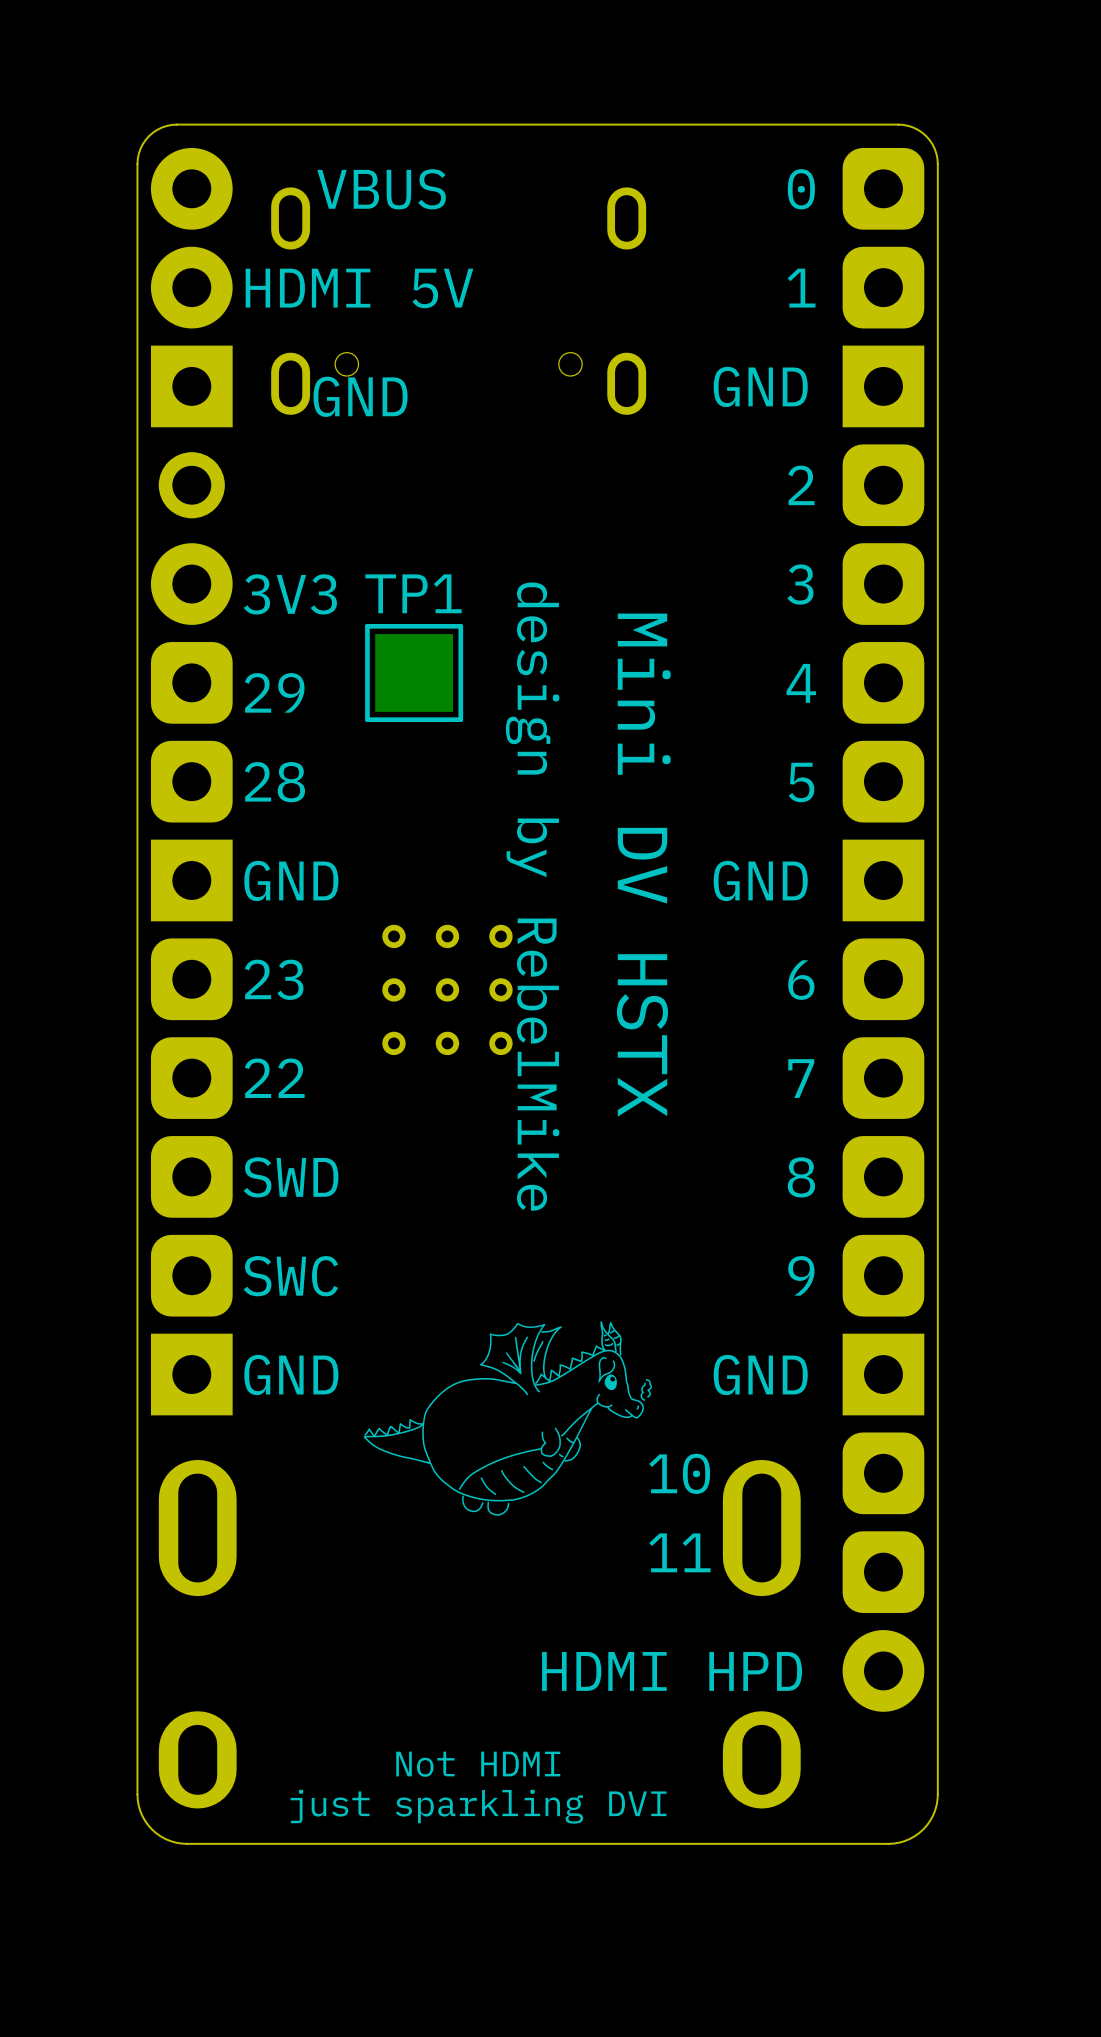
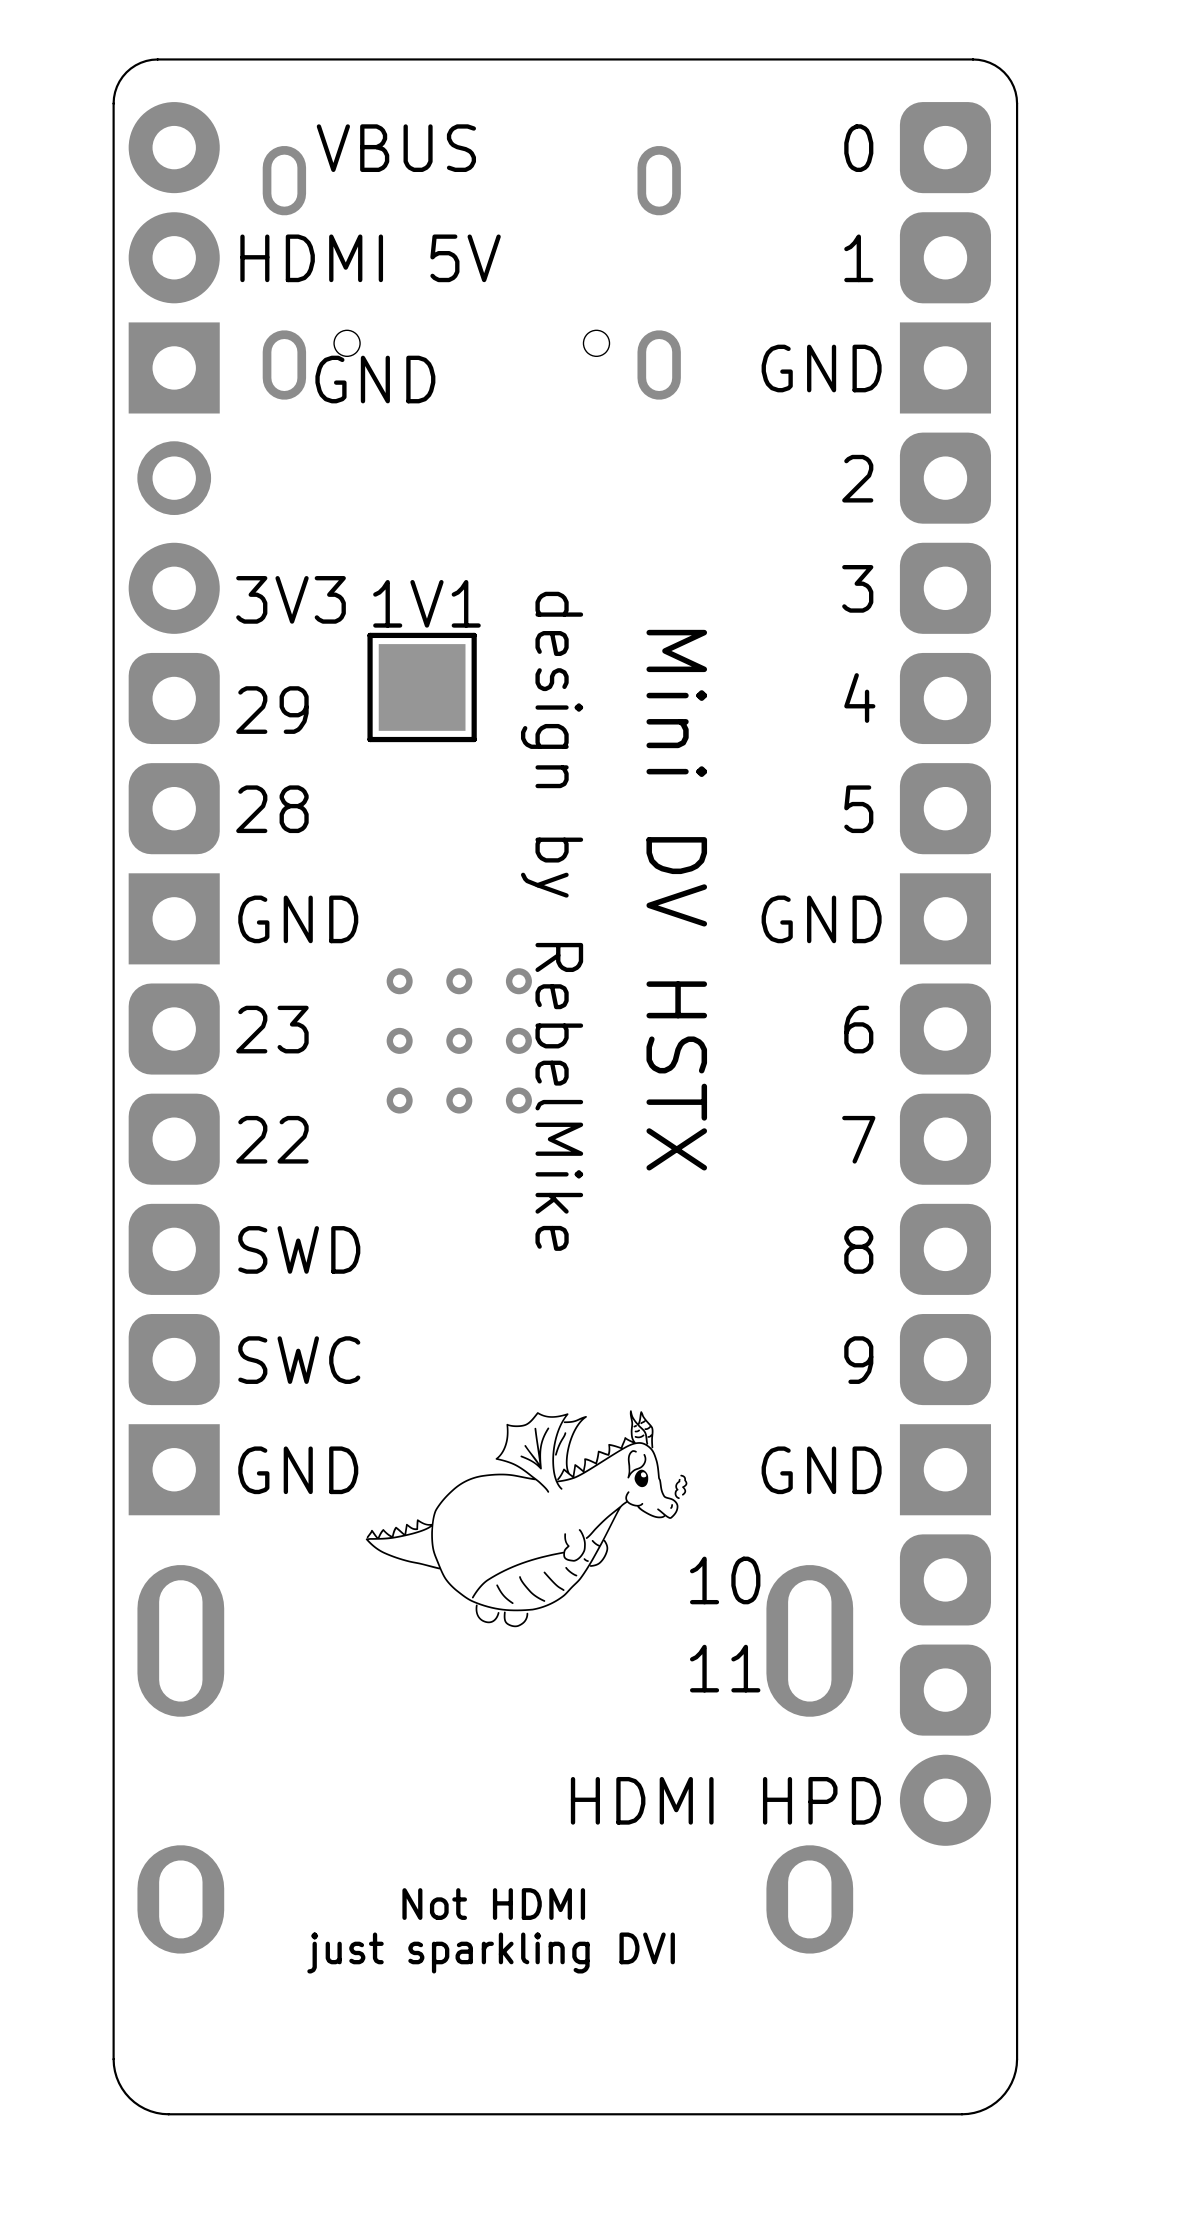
board edge: (137, 164) (140, 148) (149, 136) (161, 127) (176, 124) (898, 124) (913, 127) (926, 136) (934, 148) (937, 164) (937, 1794) (932, 1815) (923, 1829) (914, 1836) (899, 1842) (888, 1843) (186, 1843) (165, 1838) (151, 1829) (142, 1815) (137, 1794) -> (113, 120) (115, 92) (122, 76) (135, 65) (146, 60) (157, 59) (973, 59) (984, 60) (995, 65) (1007, 76) (1013, 86) (1017, 103) (1016, 2065) (1011, 2083) (1000, 2098) (985, 2108) (968, 2113) (162, 2113) (144, 2108) (129, 2098) (119, 2083) (115, 2071) (113, 1937)
TP1 name: TP1 (413, 593) -> none
text: none -> 1V1 (426, 603)

